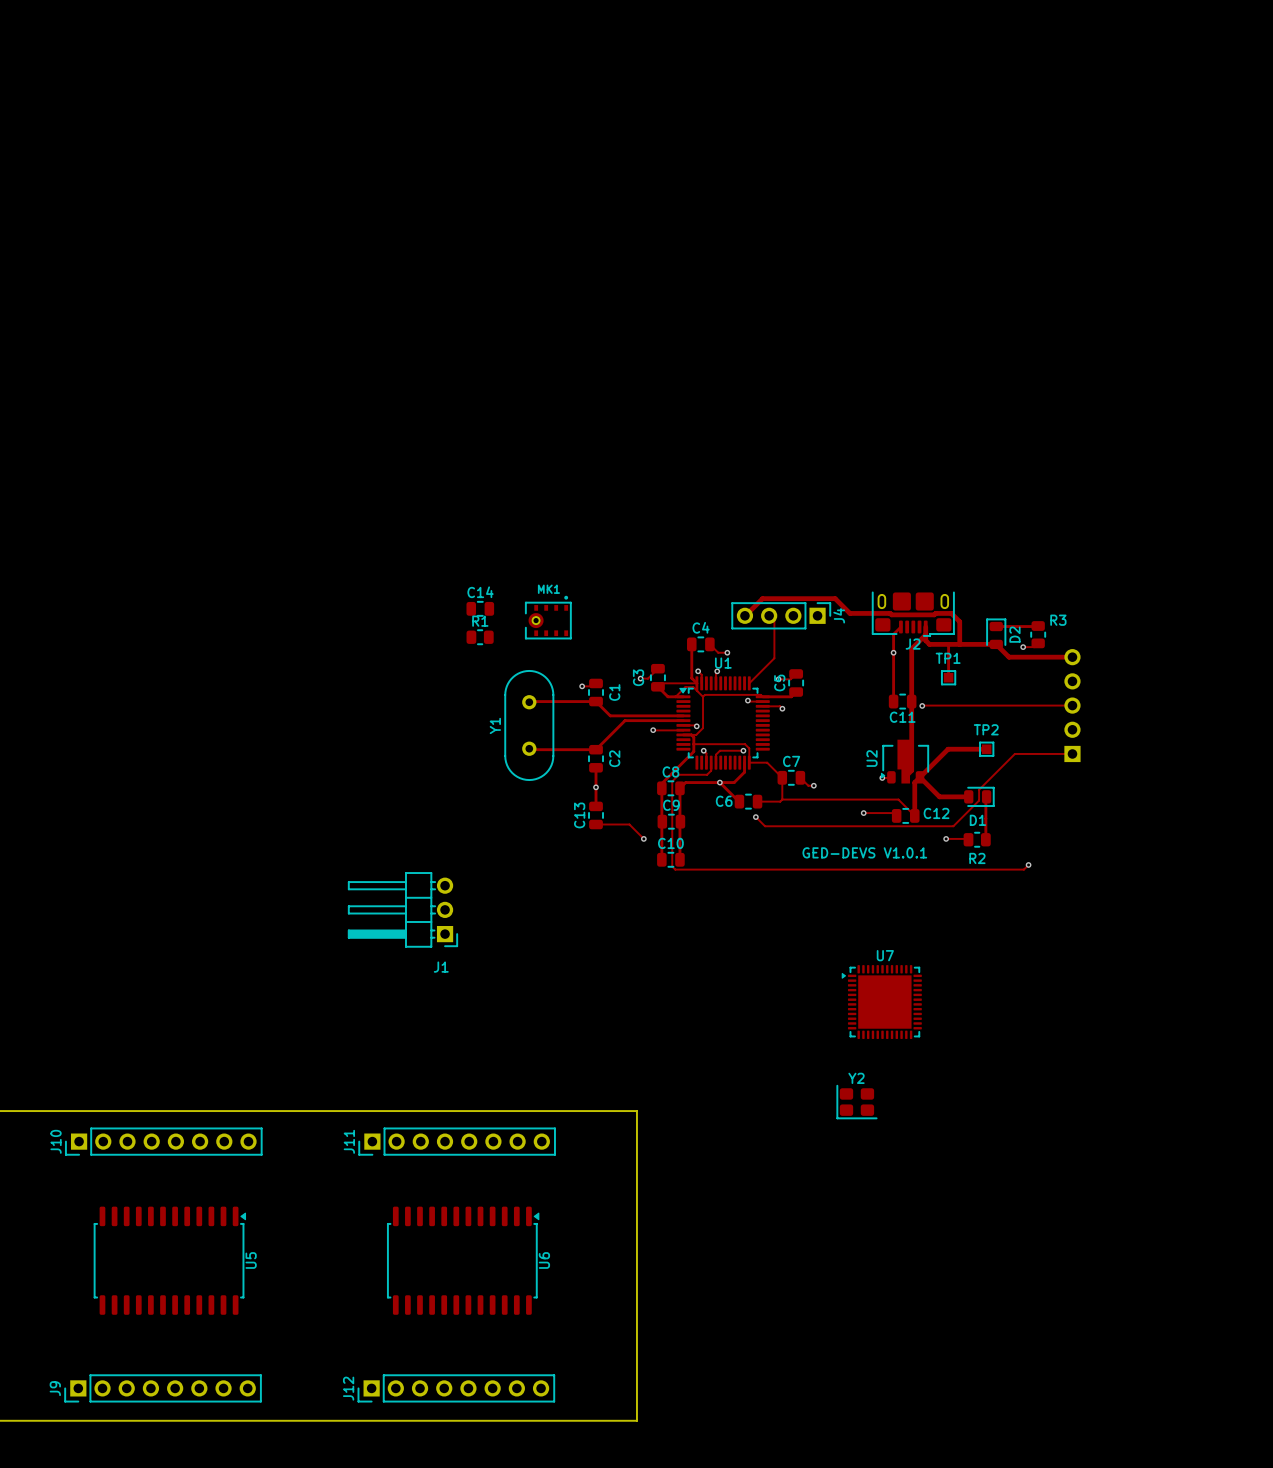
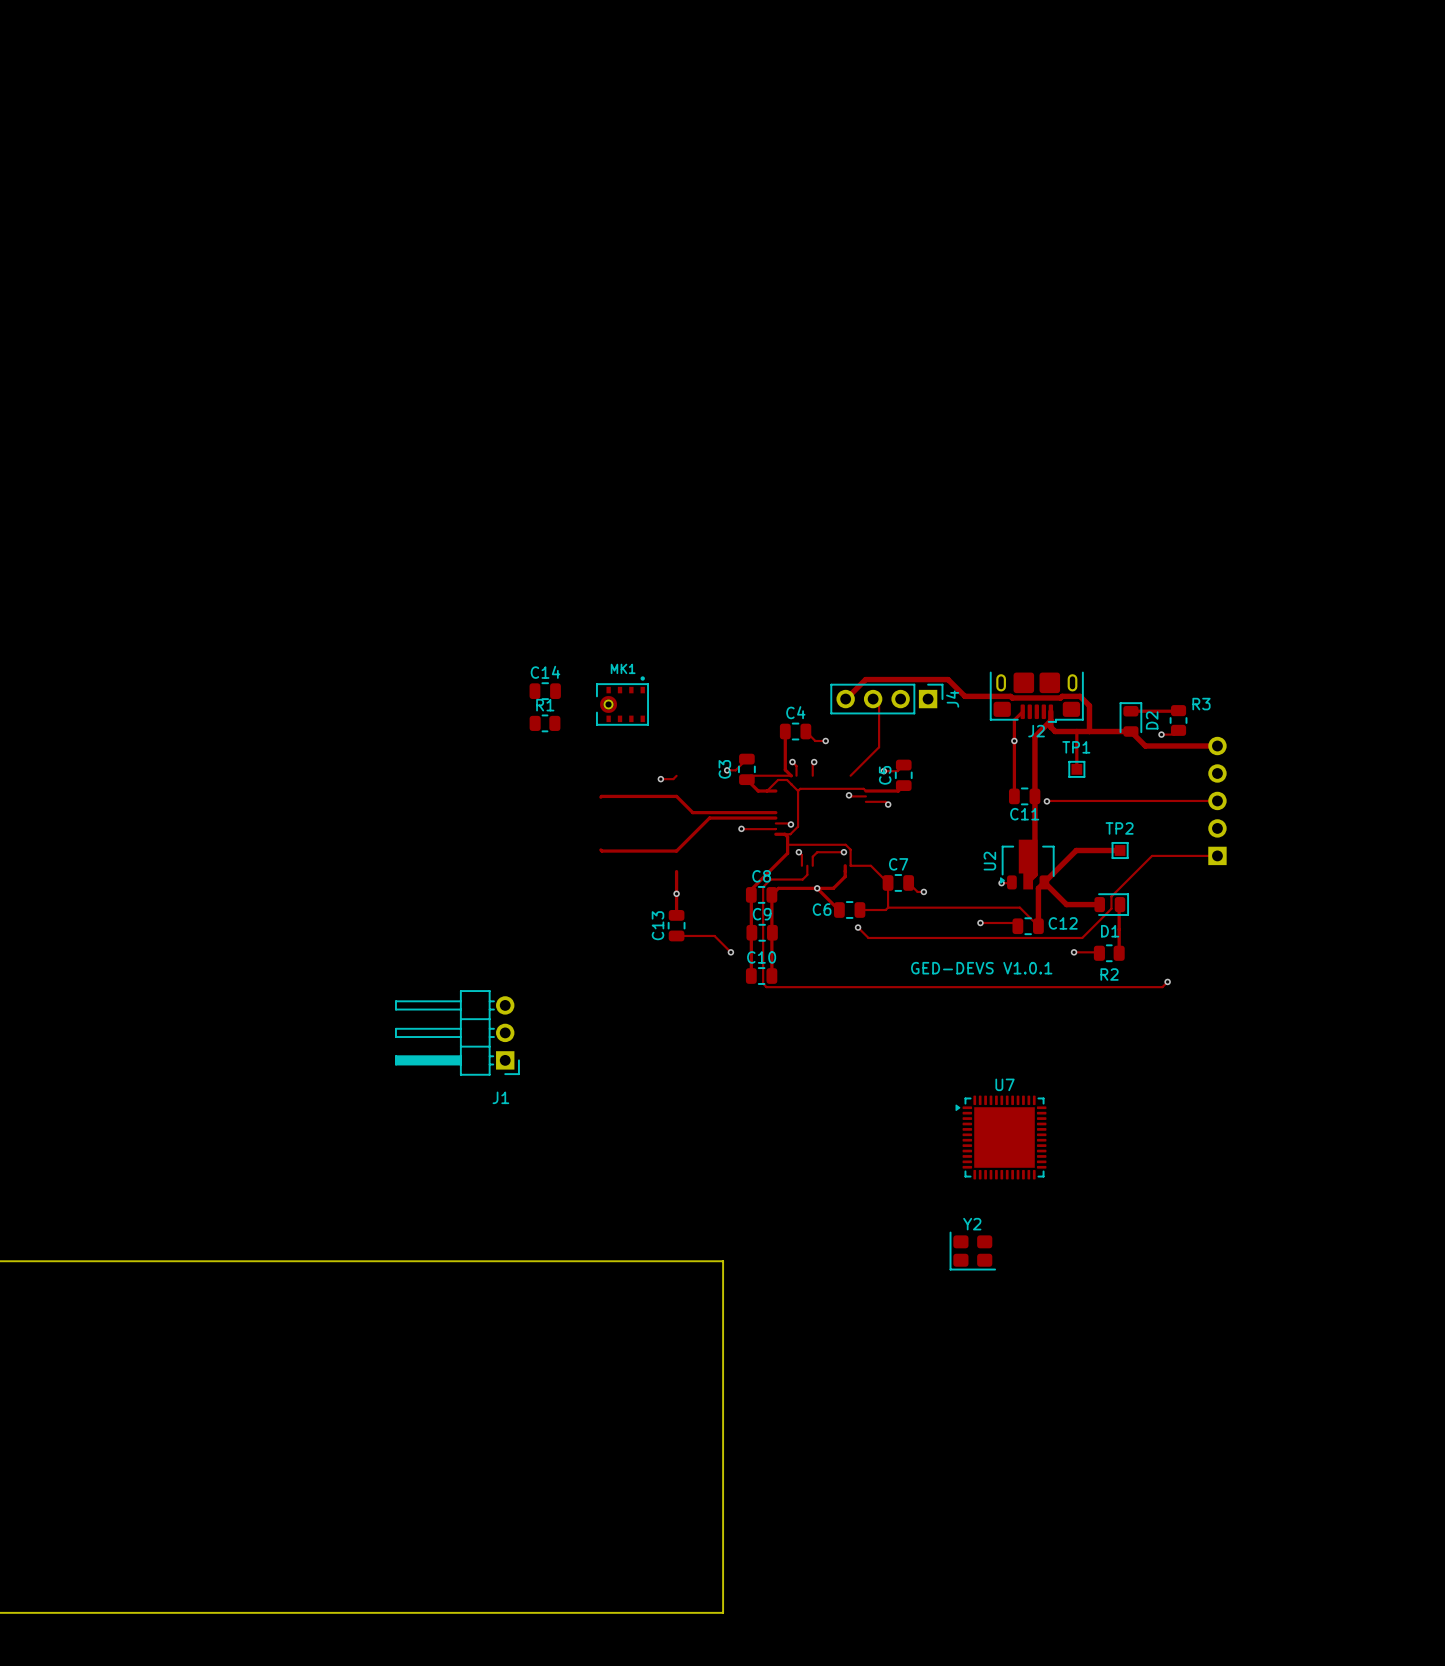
C1: (596, 692) -> none
U1: (723, 723) -> none
Y1: (529, 725) -> none
C2: (596, 758) -> none
J10: (163, 1141) -> none
J11: (457, 1141) -> none
U5: (170, 1260) -> none
U6: (463, 1260) -> none
J9: (163, 1388) -> none
J12: (456, 1388) -> none

